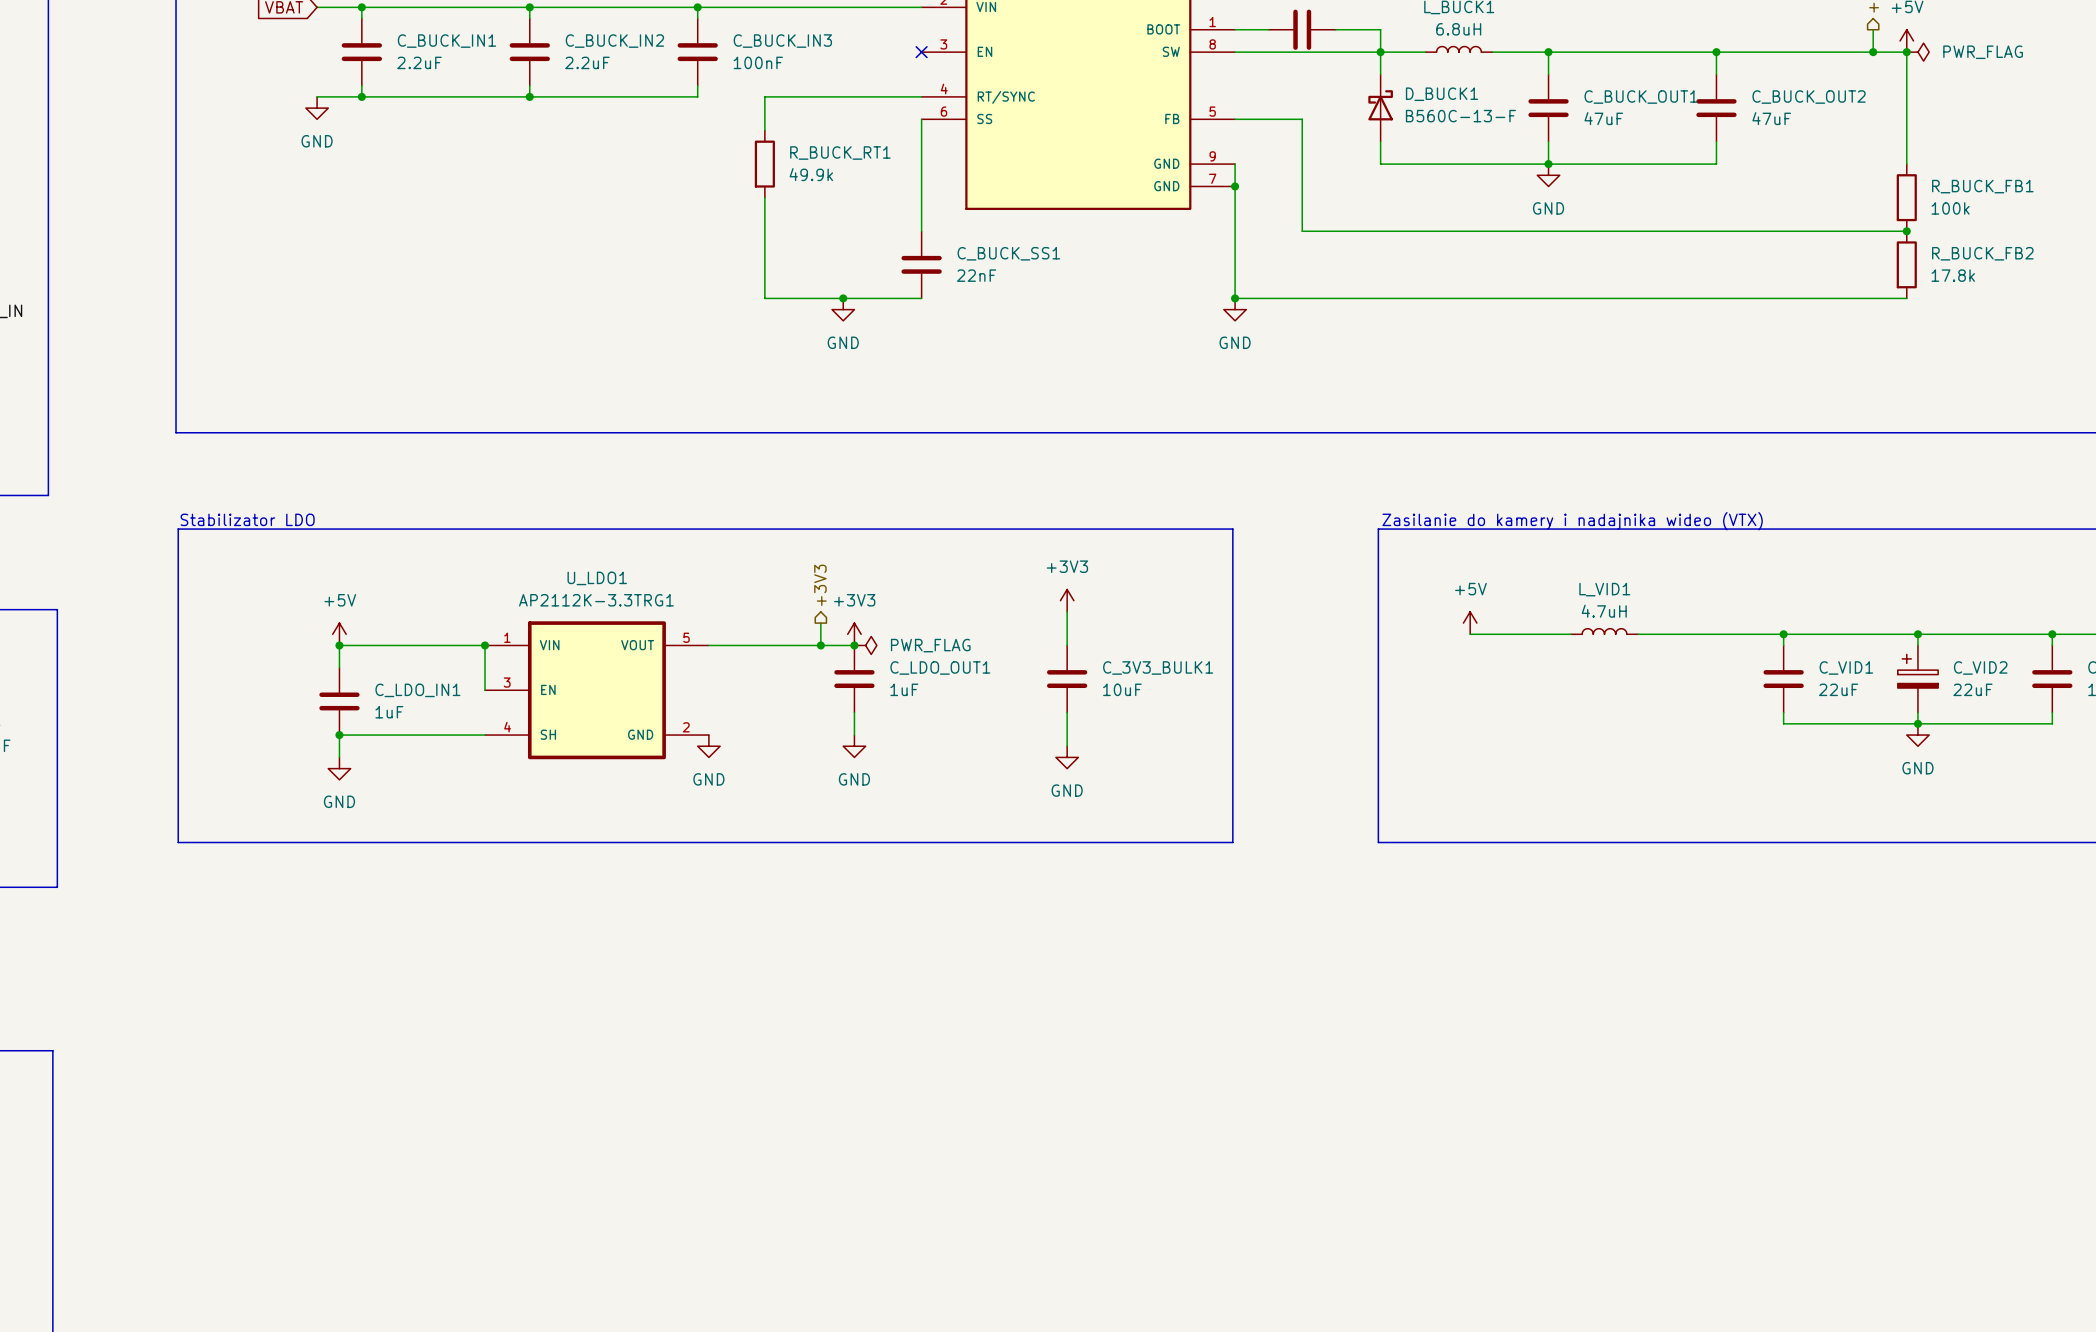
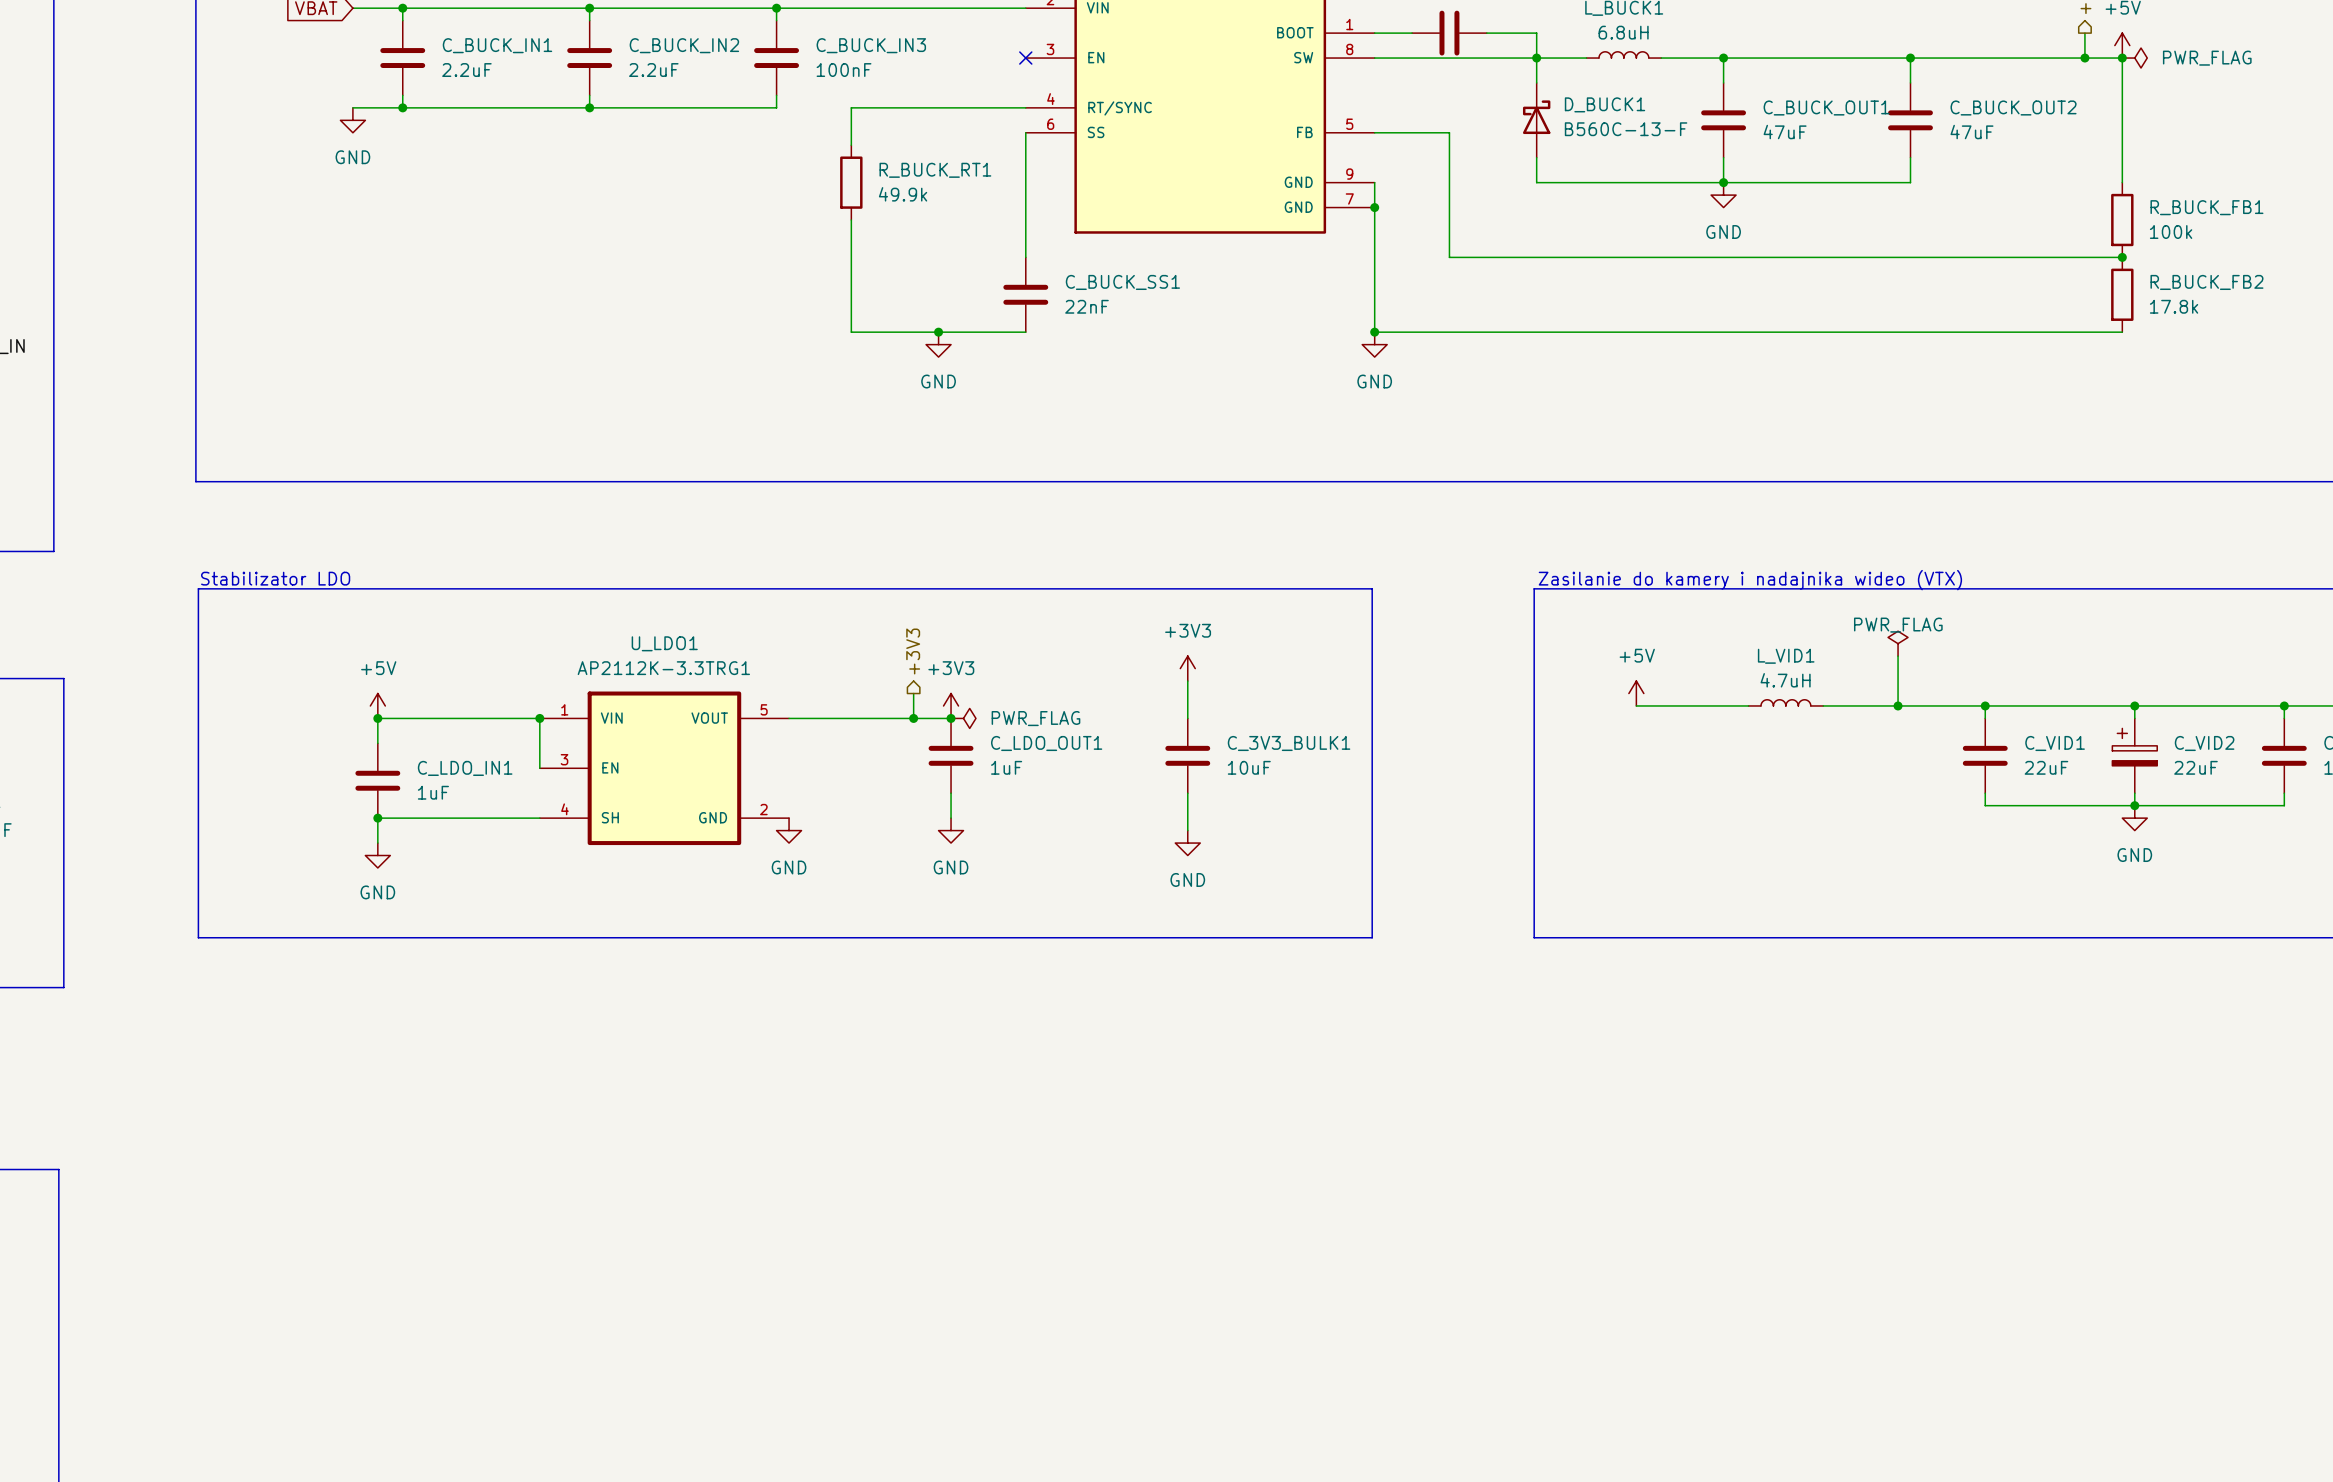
power symbol: none -> PWR_FLAG (1898, 643)
wire: none -> (1898, 656) (1898, 705)
junction: none -> (1898, 705)

